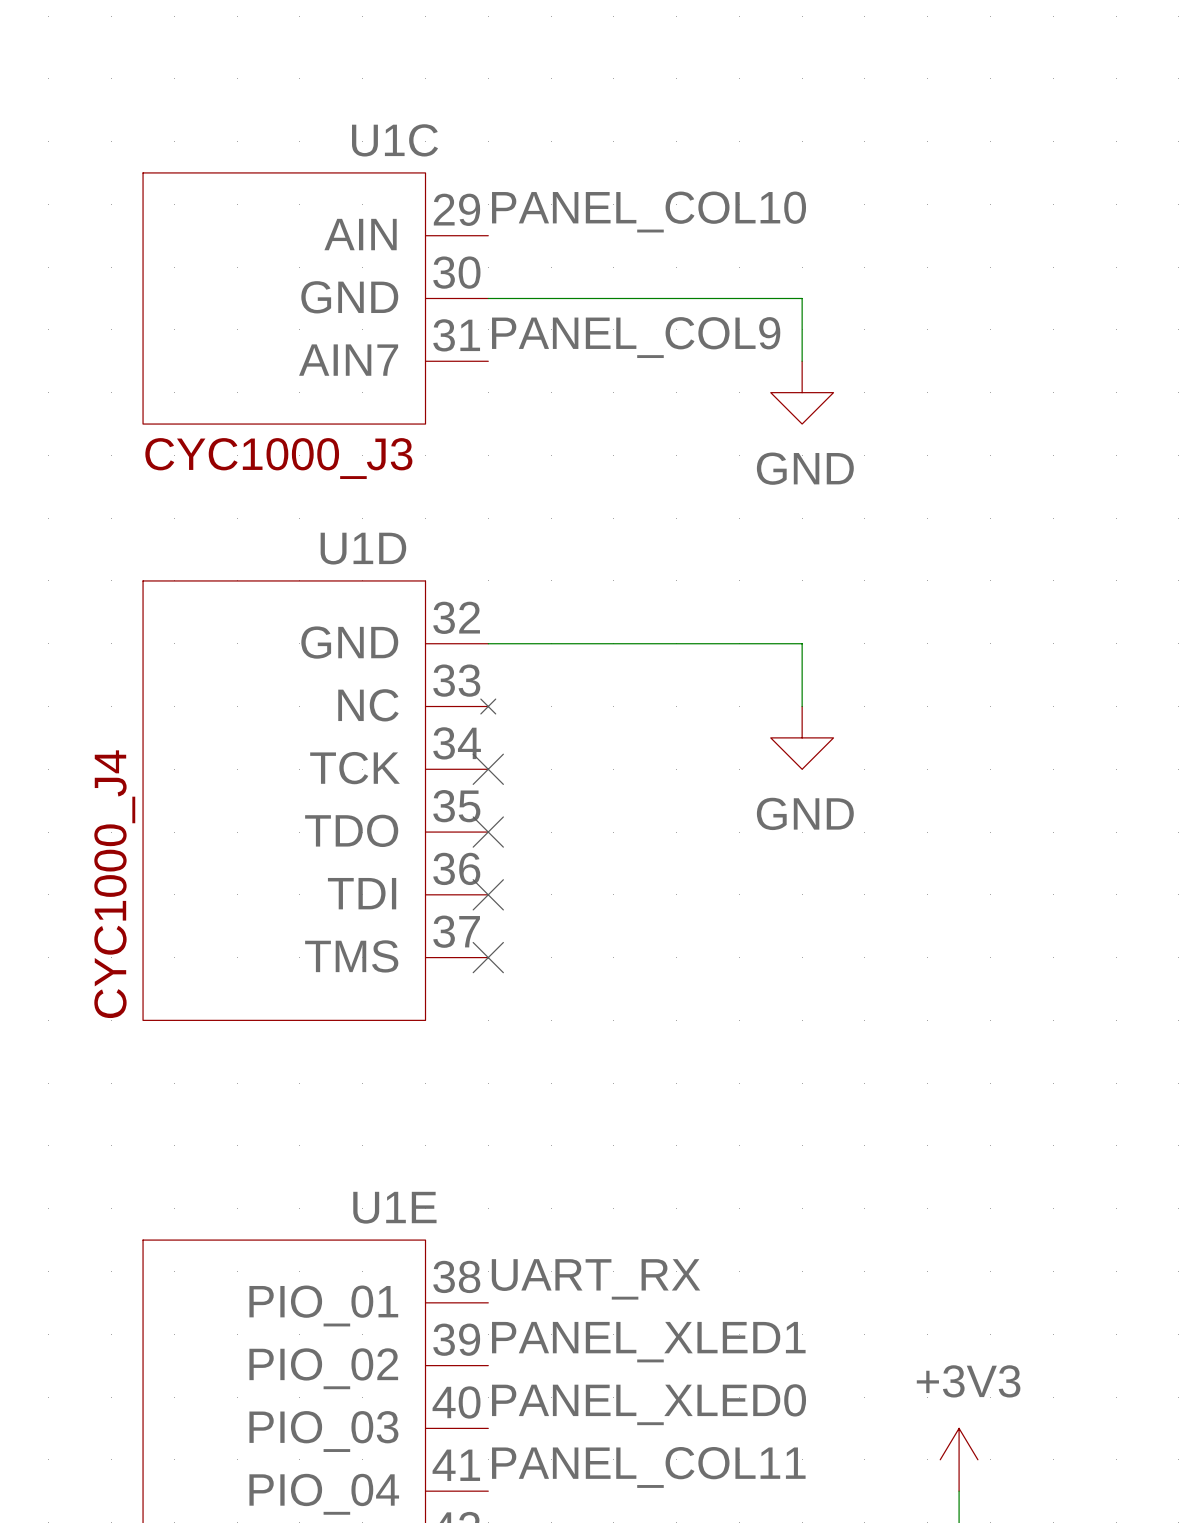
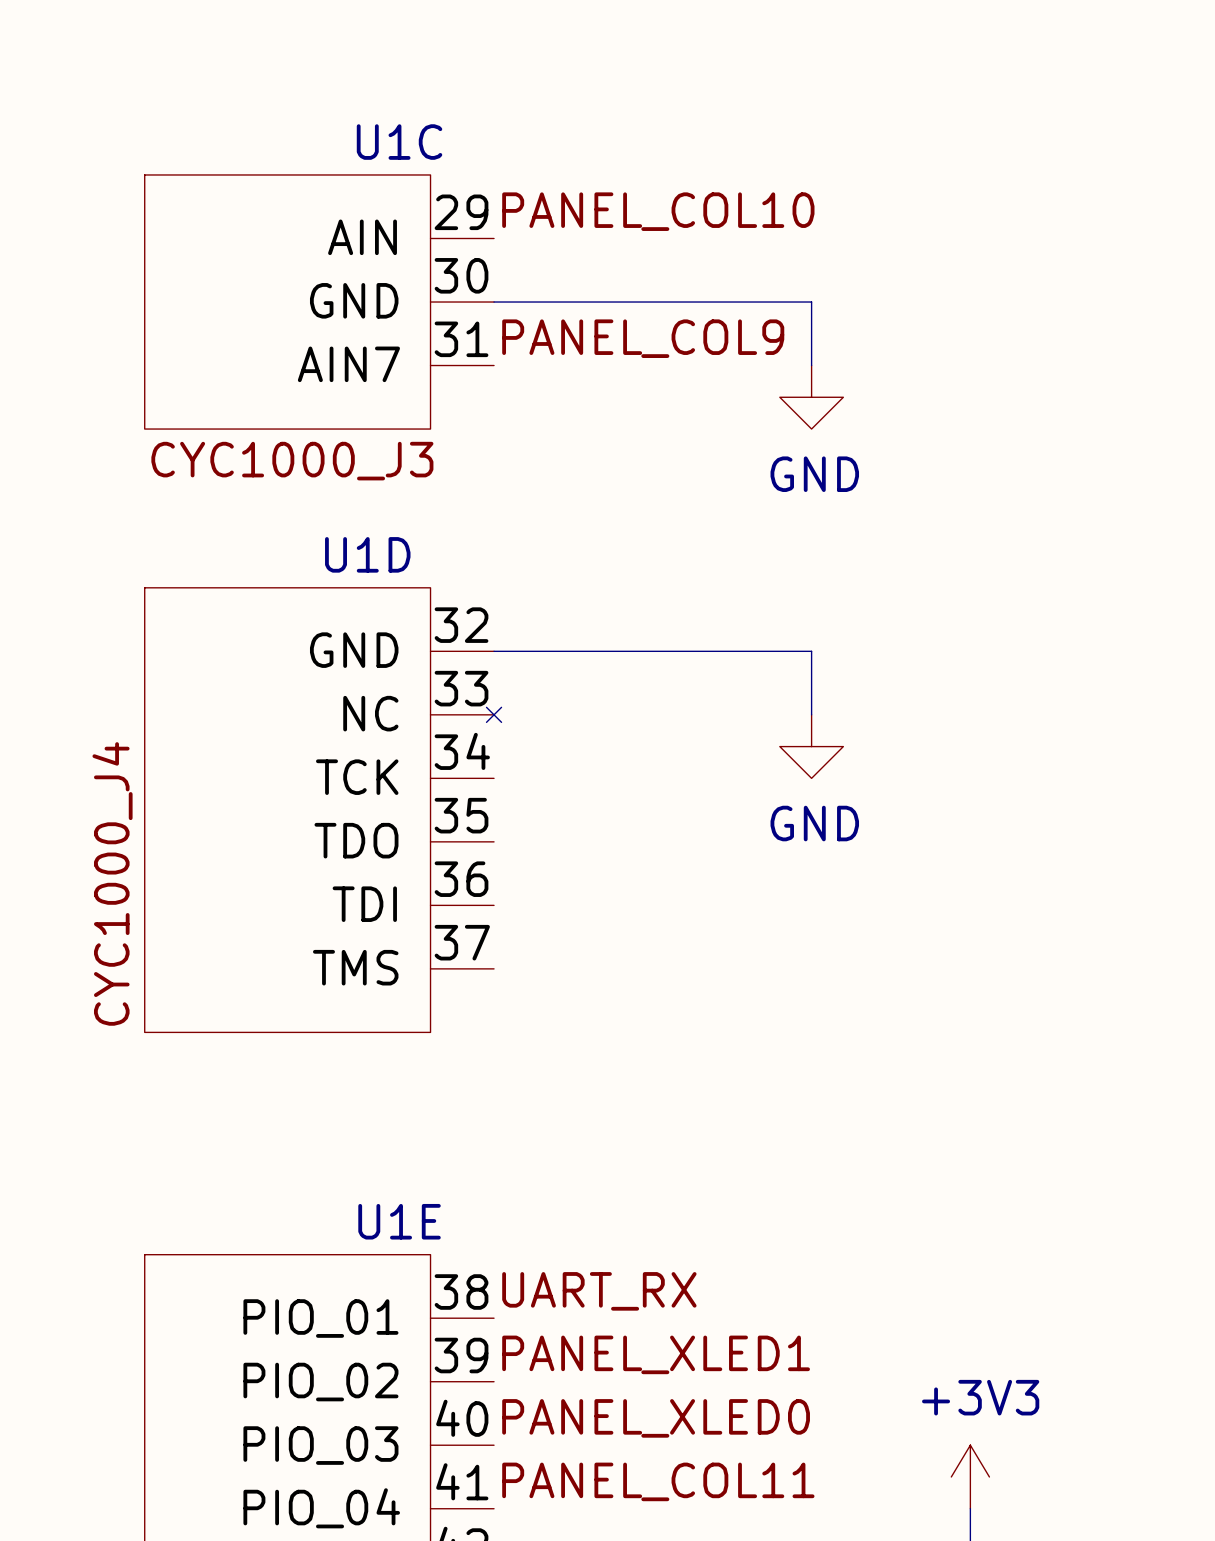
no-connect mark: (488, 769) -> none
no-connect mark: (488, 832) -> none
no-connect mark: (488, 894) -> none
no-connect mark: (488, 957) -> none

